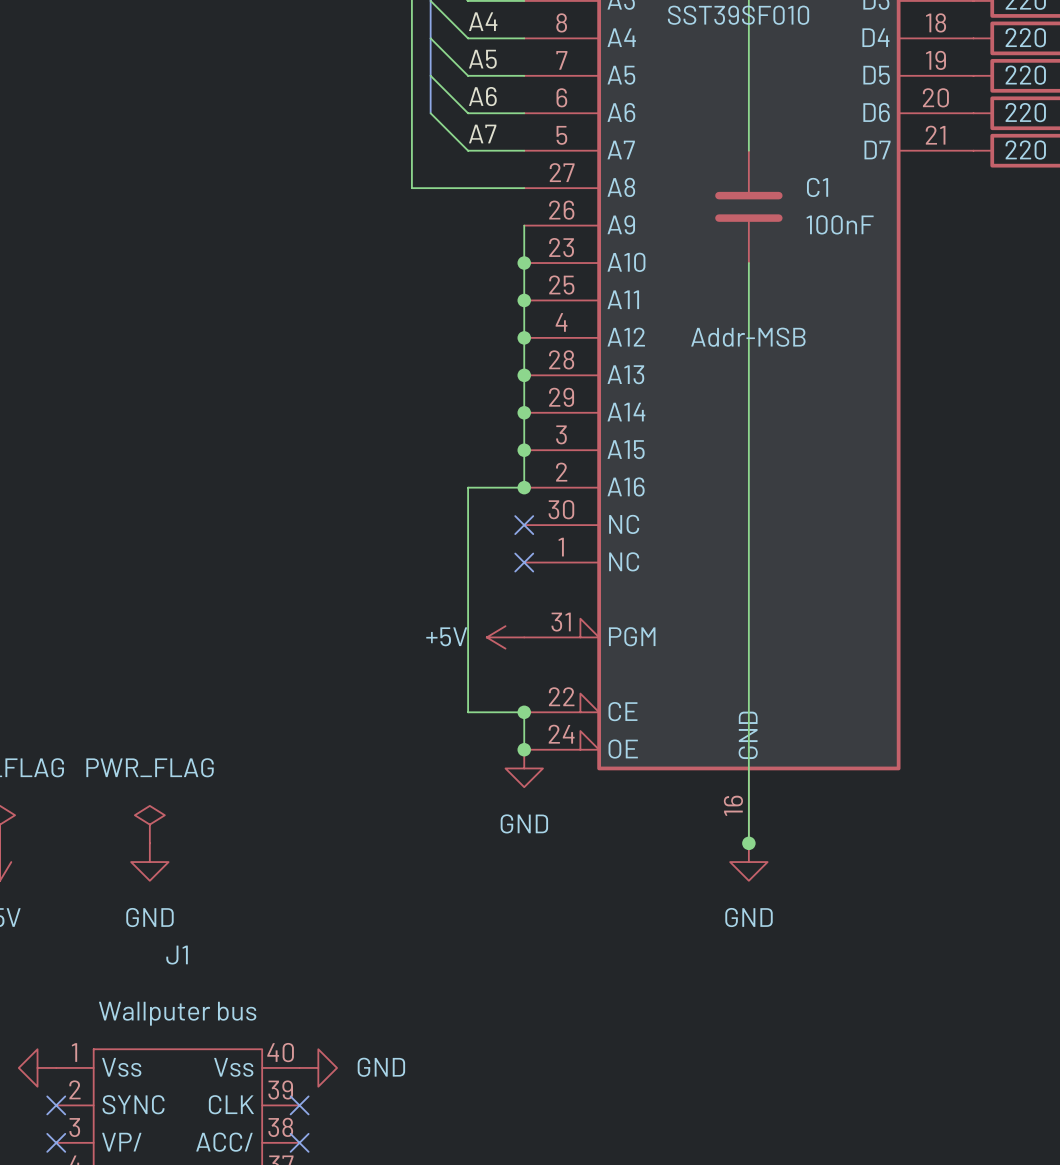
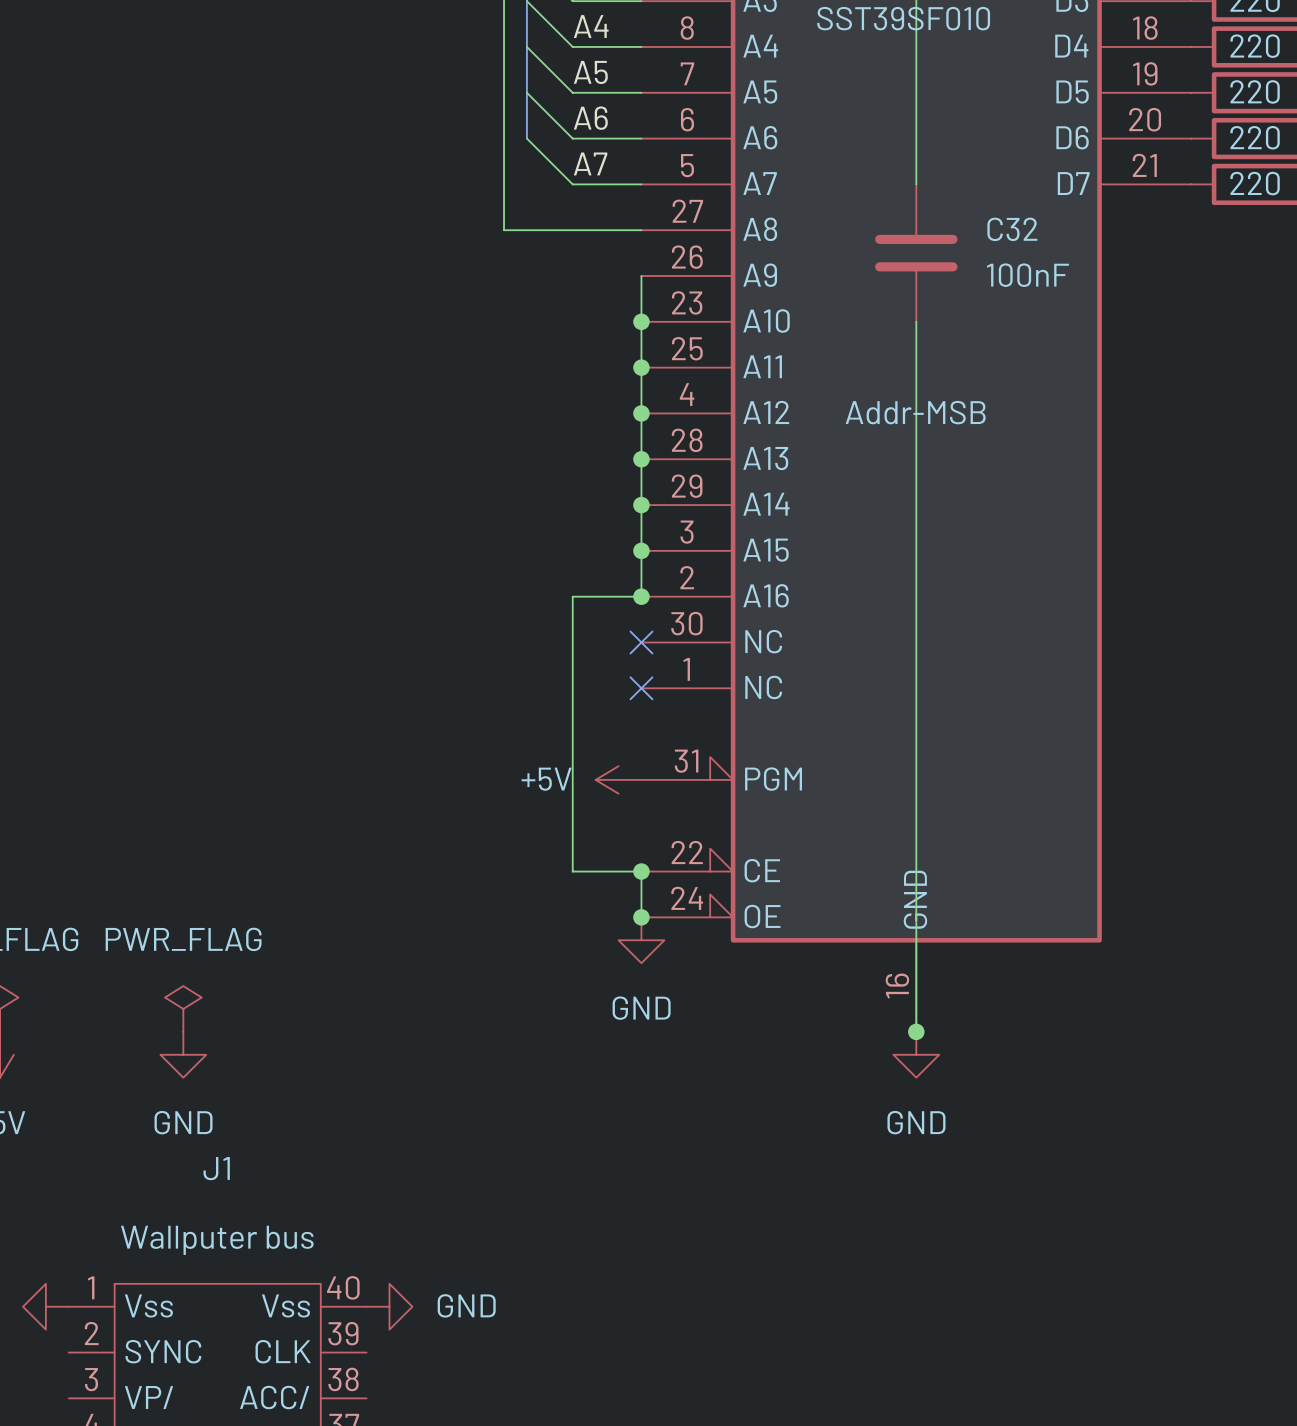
C1 name: C1 (817, 187) -> C32 (1012, 229)
no-connect mark: (56, 1105) -> none
no-connect mark: (299, 1105) -> none
no-connect mark: (56, 1142) -> none
no-connect mark: (299, 1142) -> none

